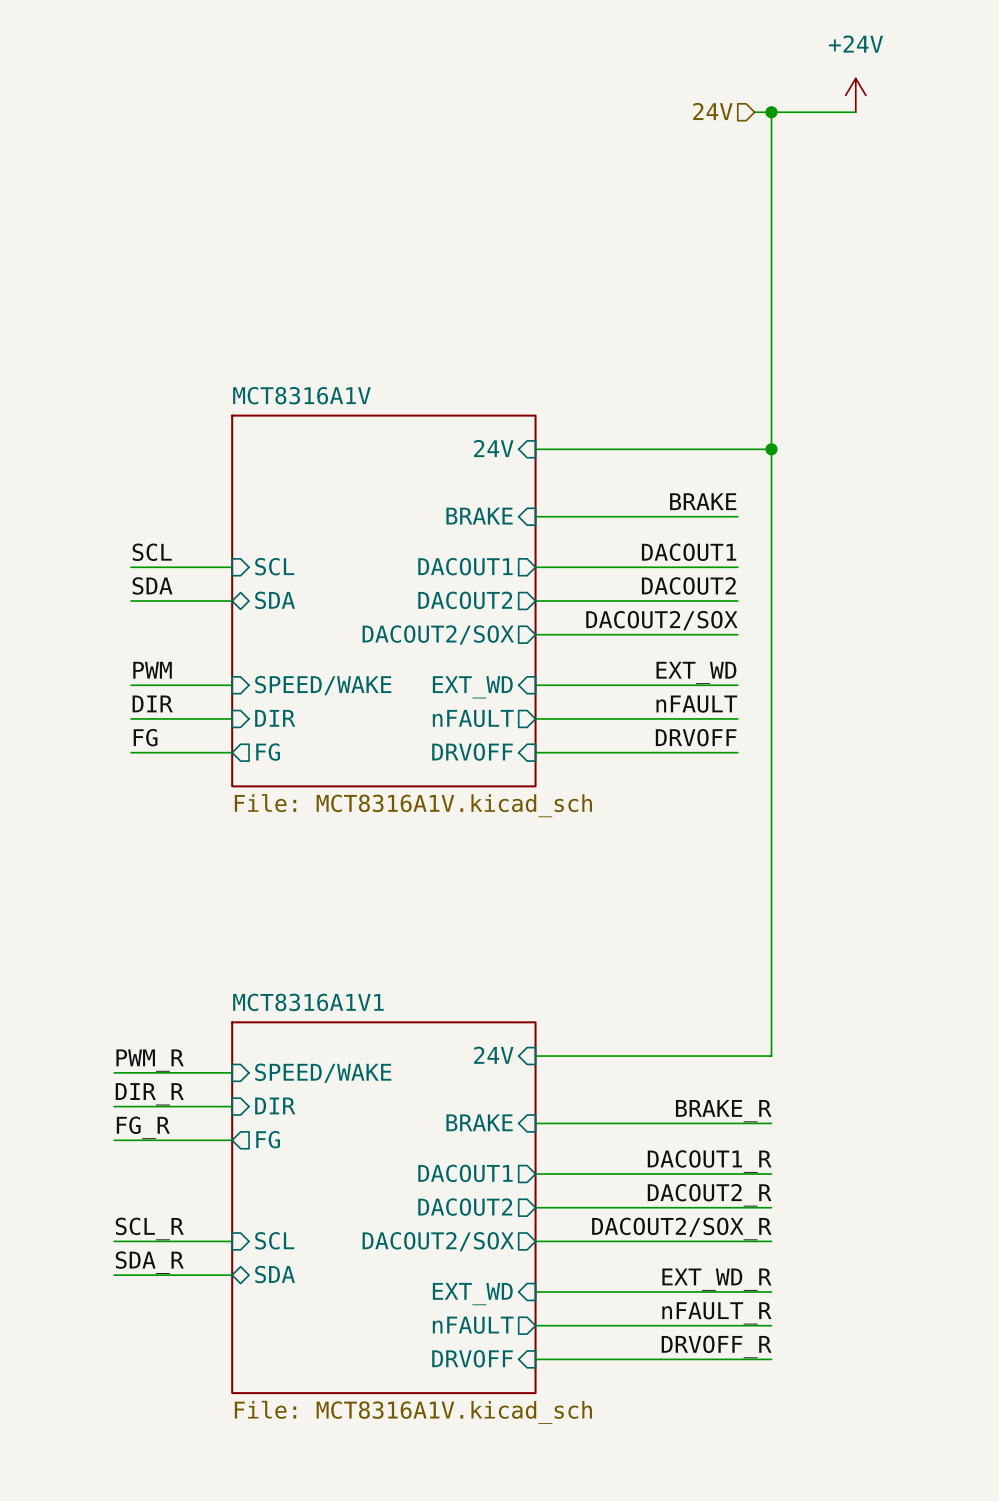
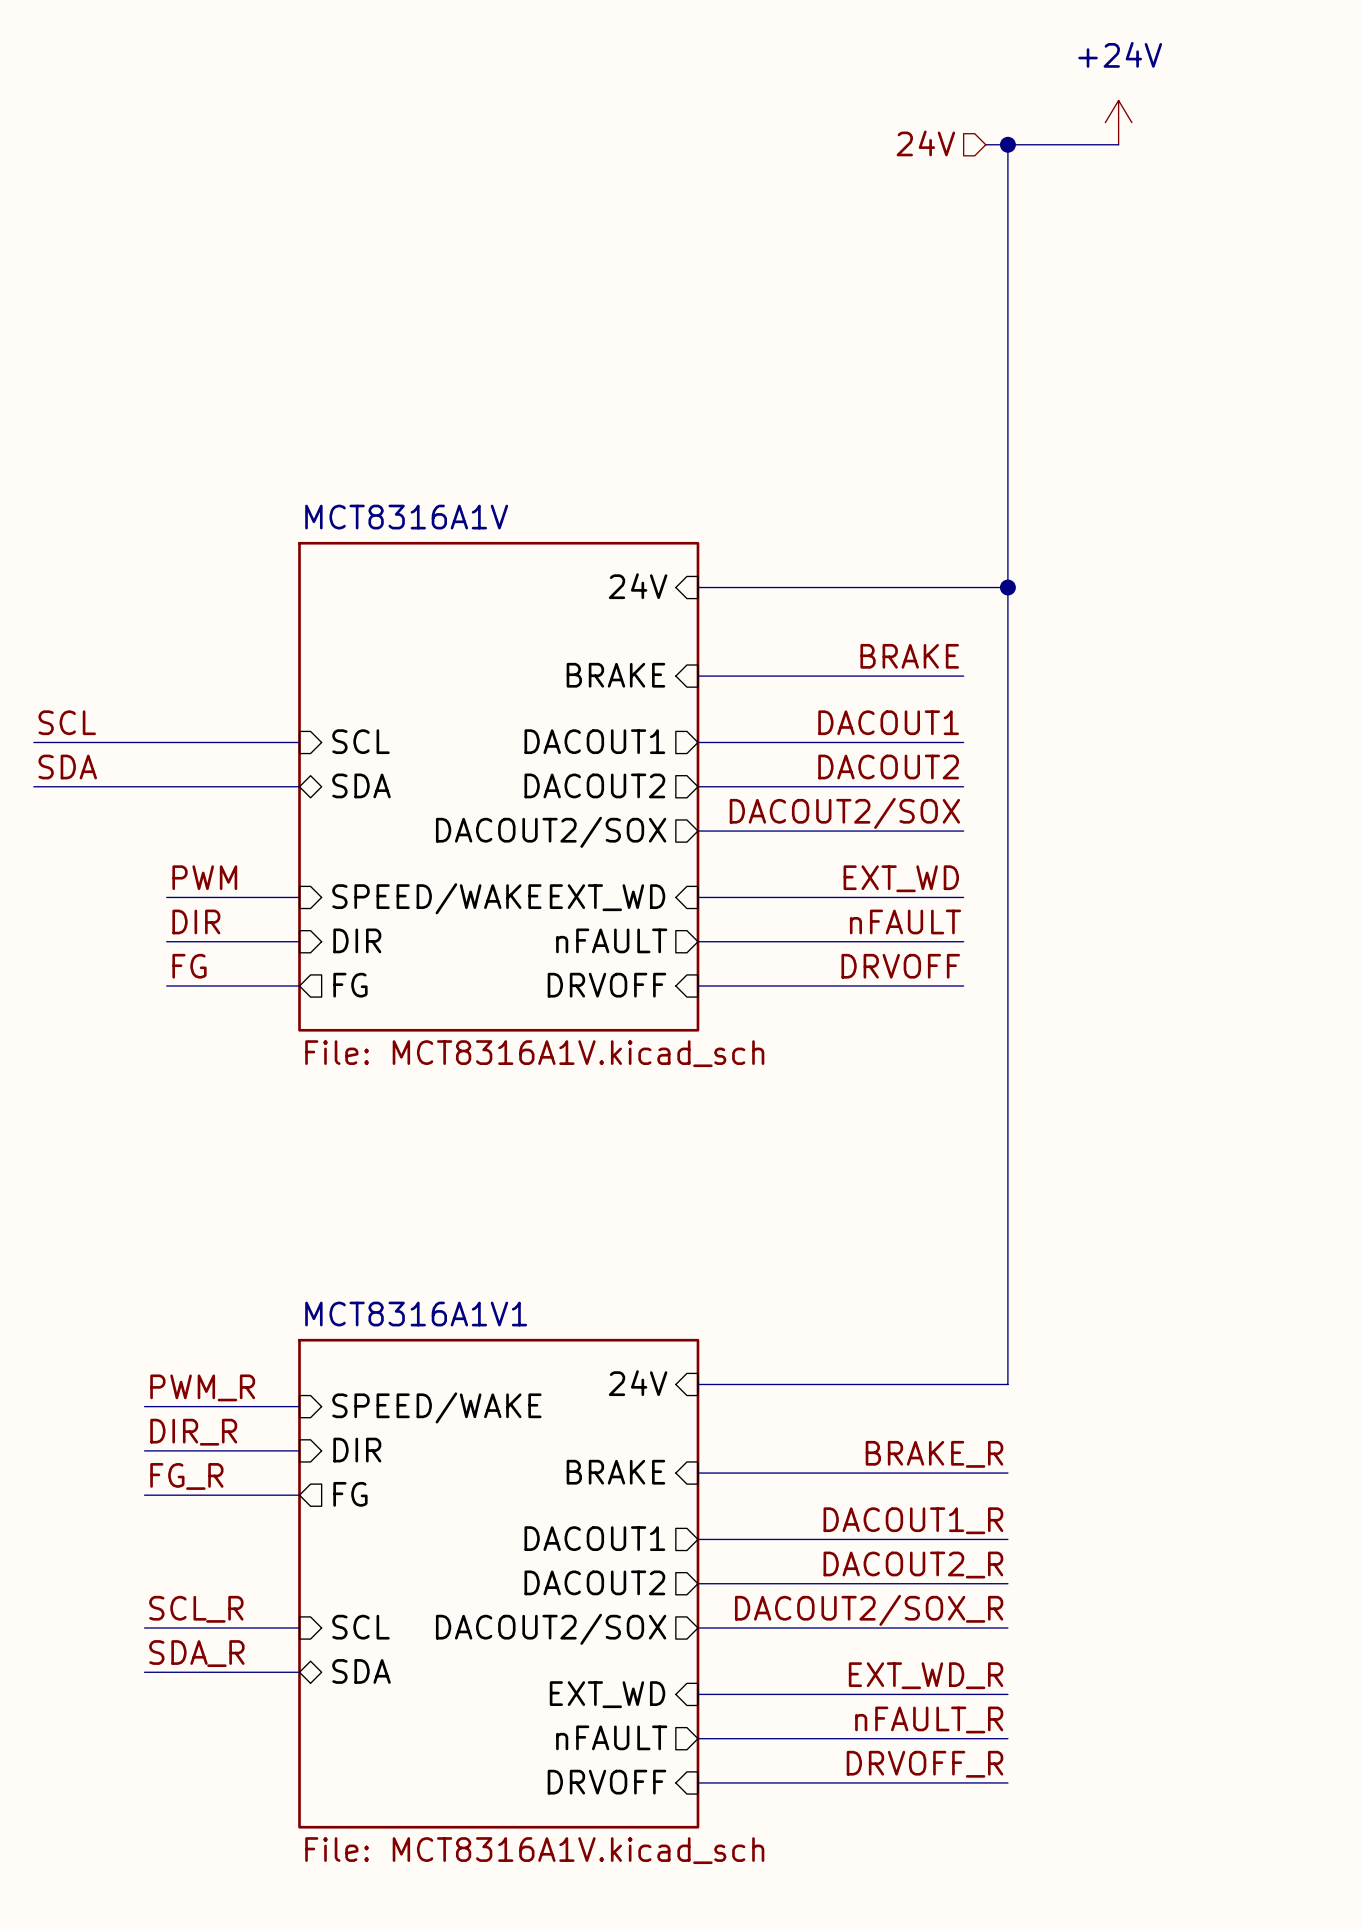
label position: SCL (152, 552) -> SCL (67, 722)
wire: none -> (33, 742) (166, 742)
label position: SDA (152, 585) -> SDA (67, 767)
wire: none -> (33, 786) (166, 786)

